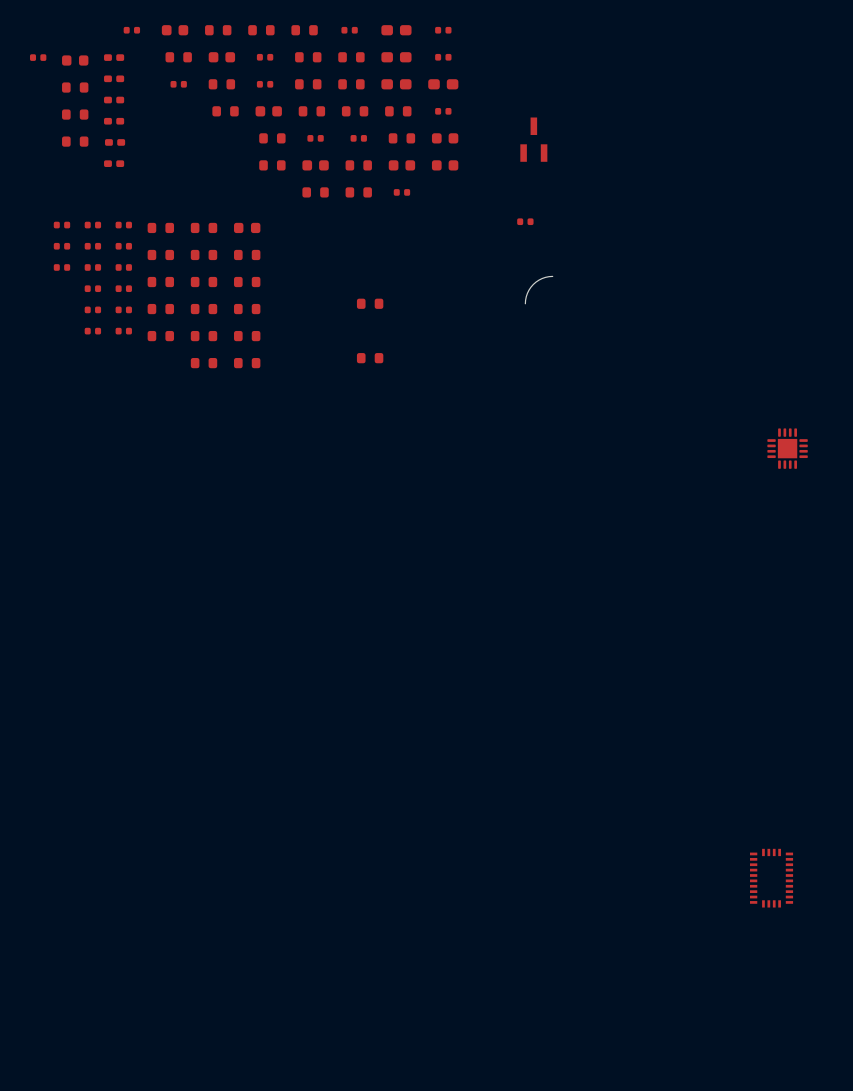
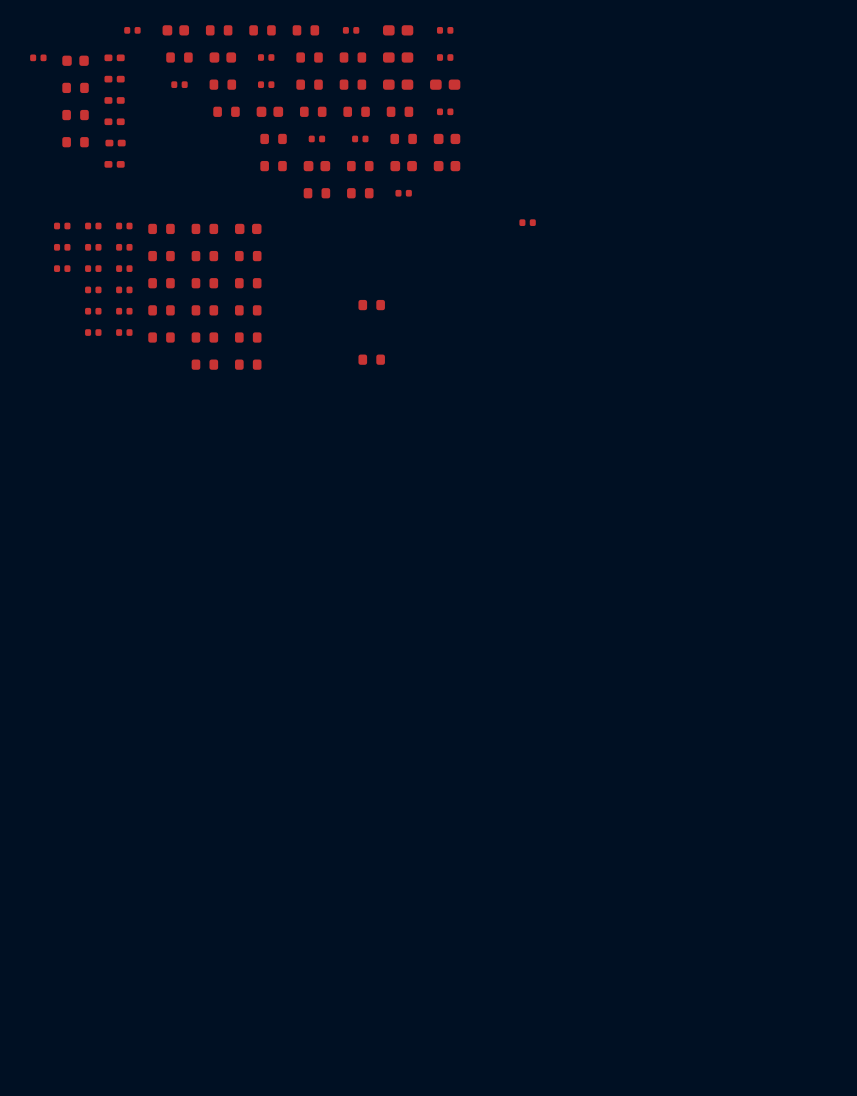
part: (533, 139) -> none
board edge: (552, 276) (542, 278) (533, 284) (527, 293) (525, 303) -> none
part: (787, 448) -> none
part: (771, 878) -> none

